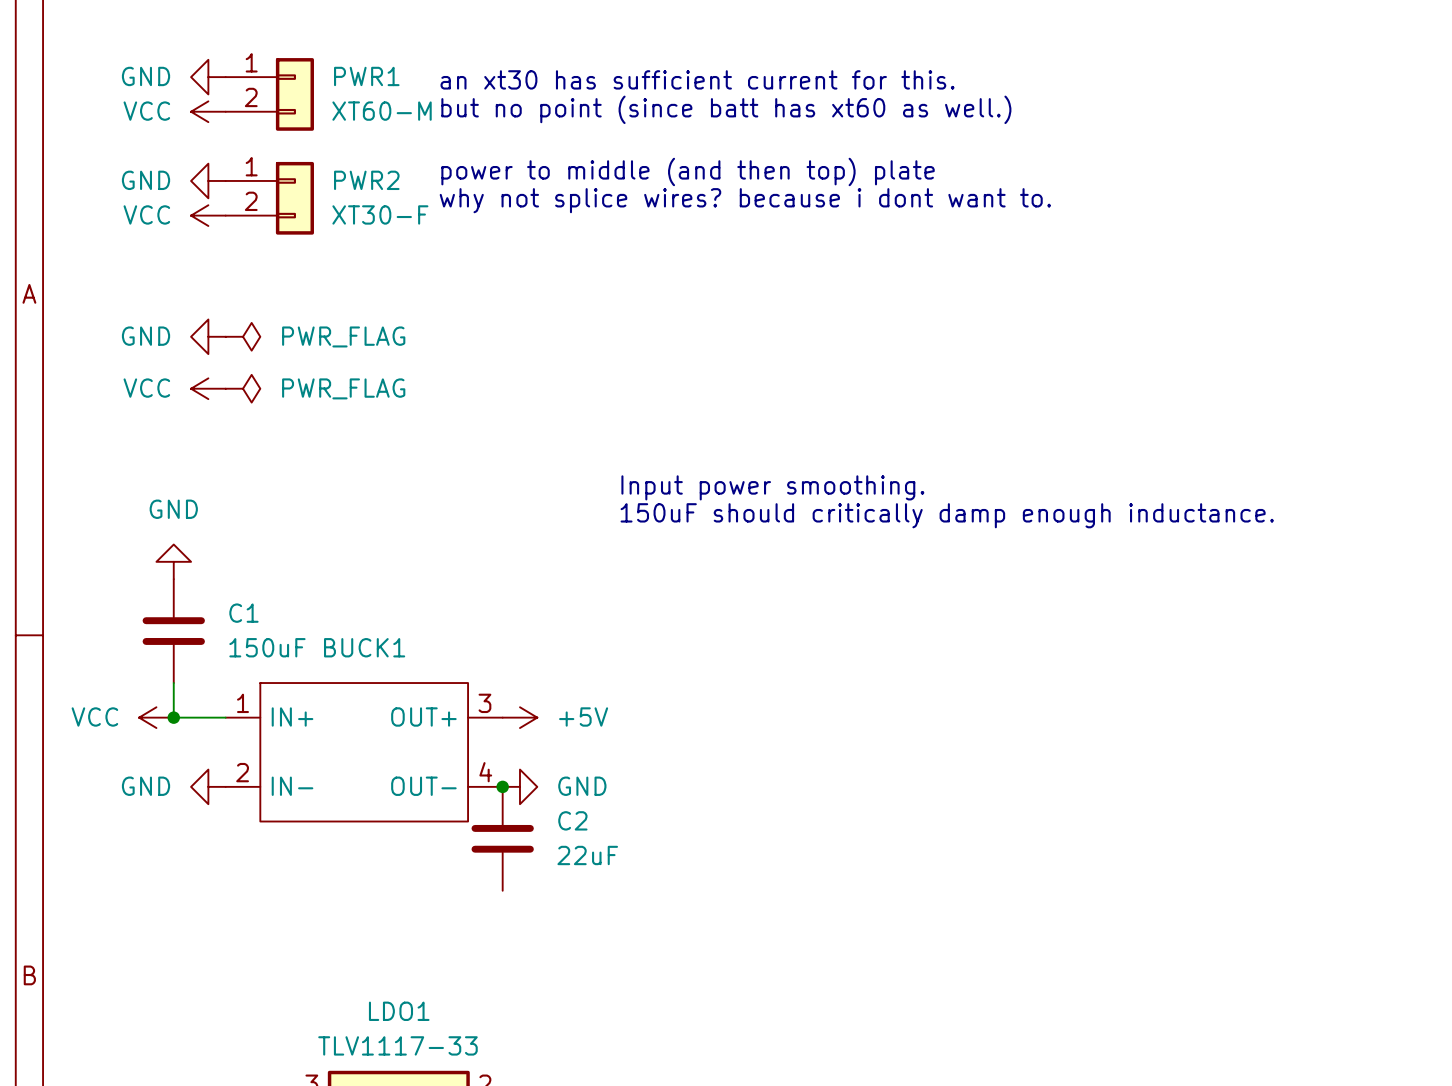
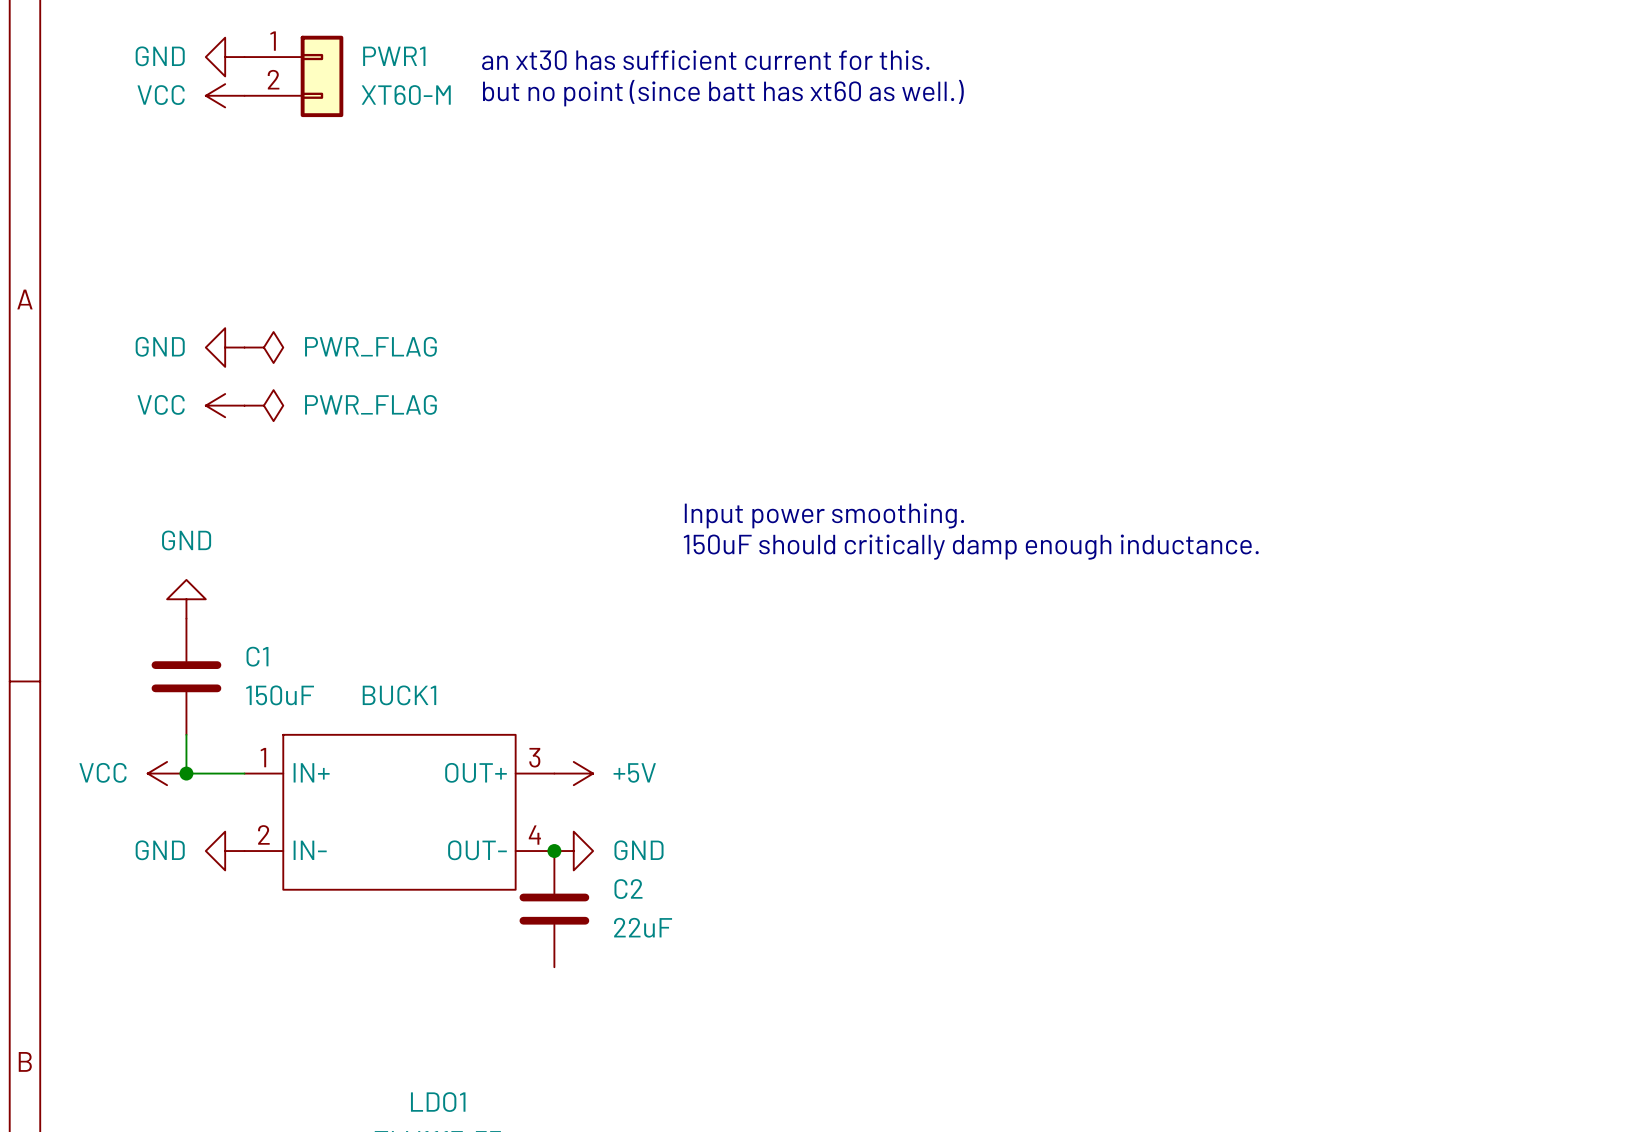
text: power to middle (and then top) plate (688, 171) -> none
power symbol: GND (208, 180) -> none
PWR2: XT30-F (269, 198) -> none
text: why not splice wires? because i dont want to. (745, 200) -> none
power symbol: VCC (208, 215) -> none

